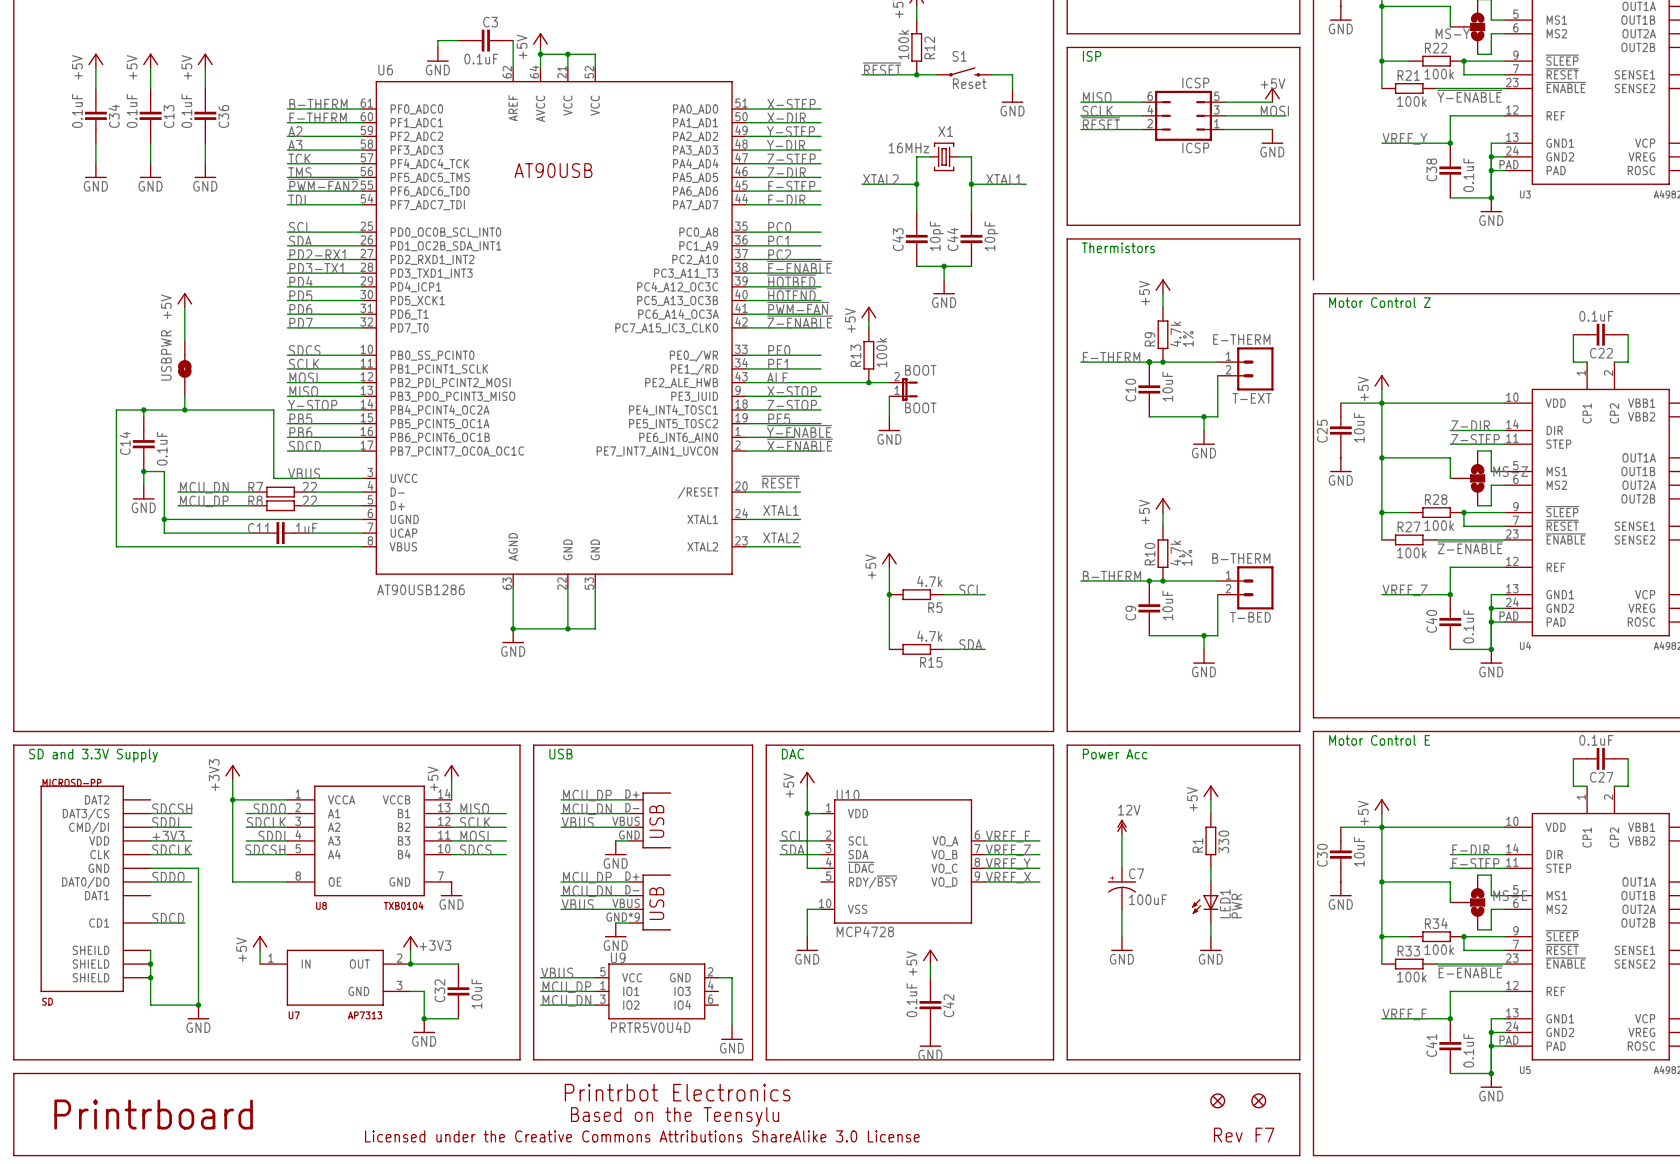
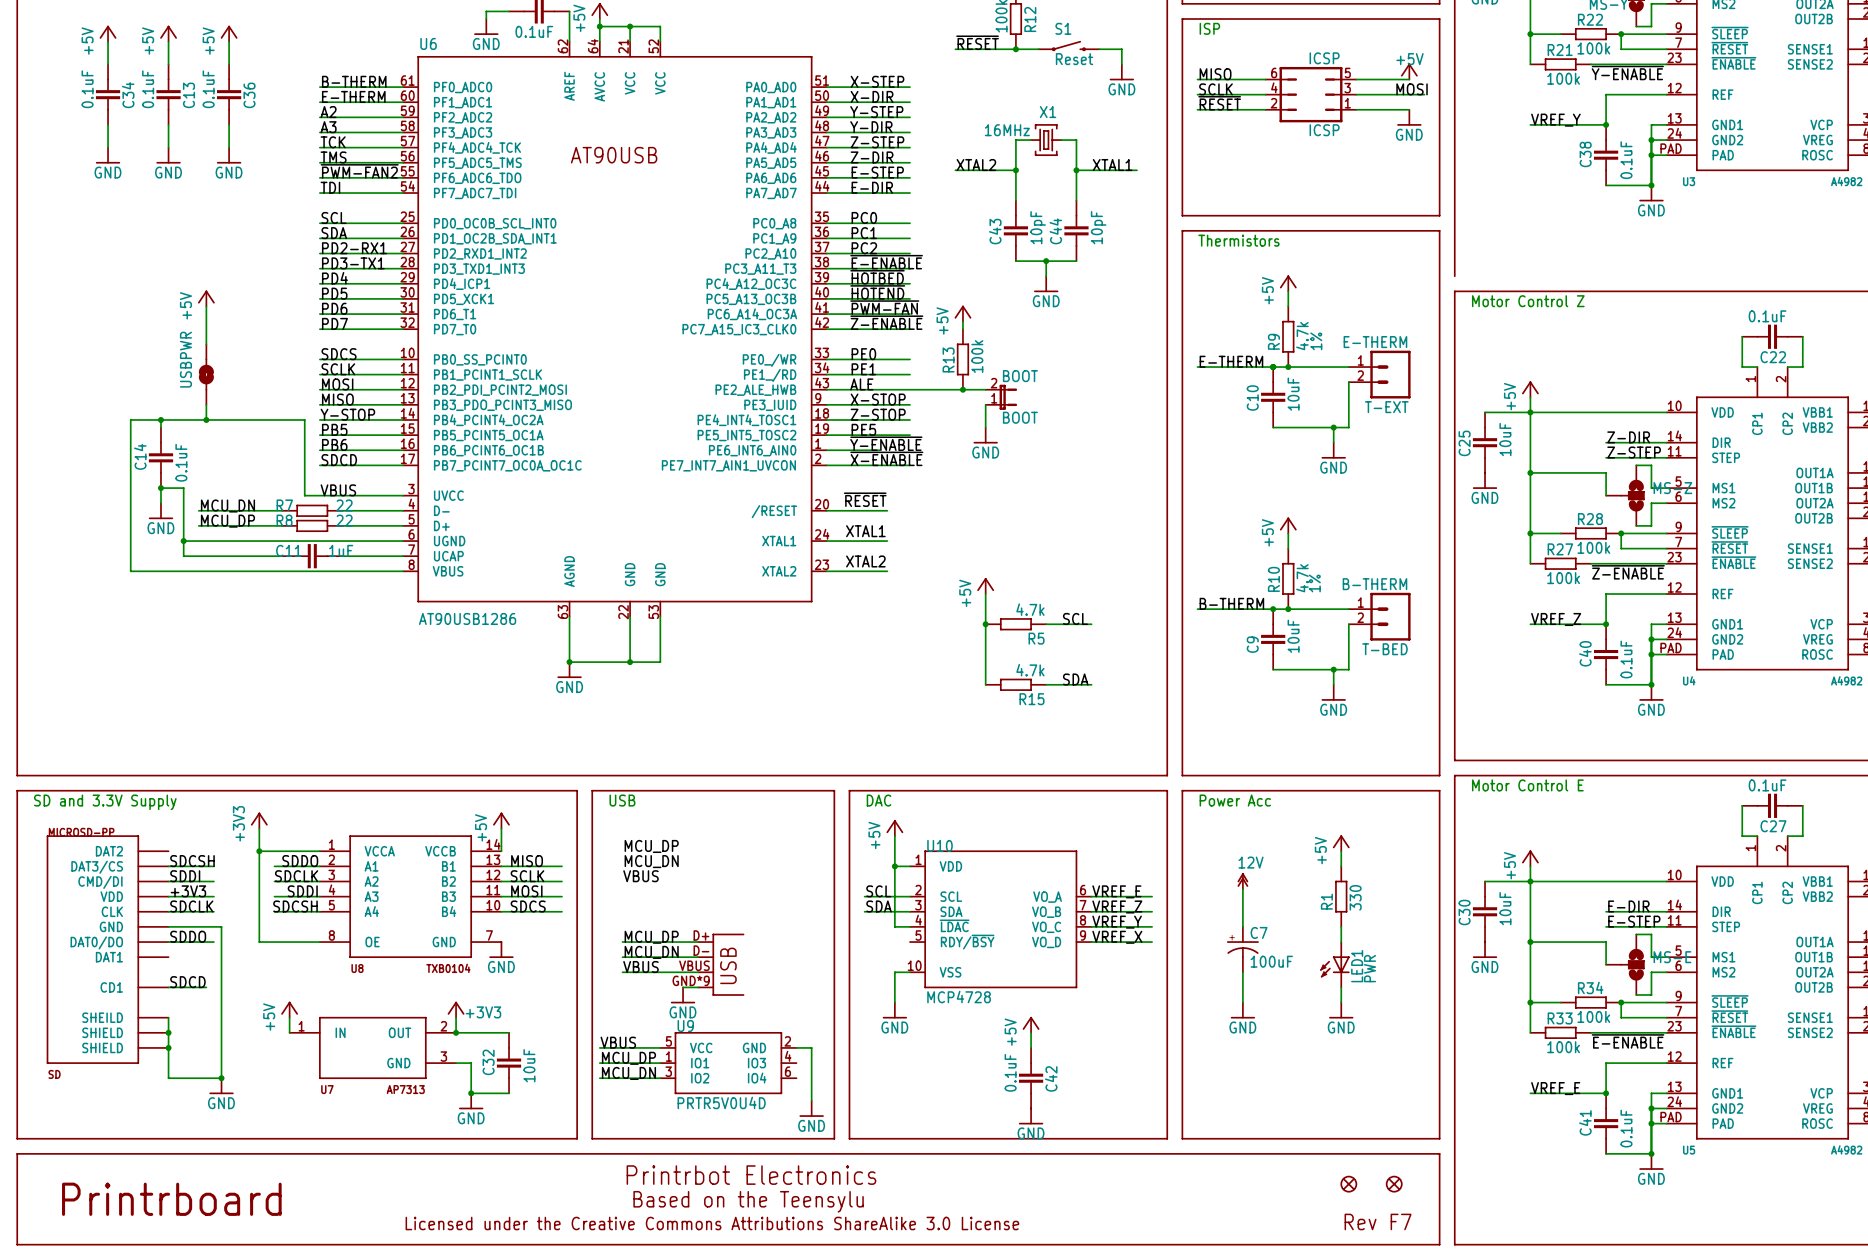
wire: (561, 799) (629, 799) -> none
wire: (561, 813) (629, 813) -> none
part: (650, 820) -> none
wire: (561, 827) (629, 827) -> none
wire: (615, 840) (629, 840) -> none
power symbol: GND (615, 848) -> none

